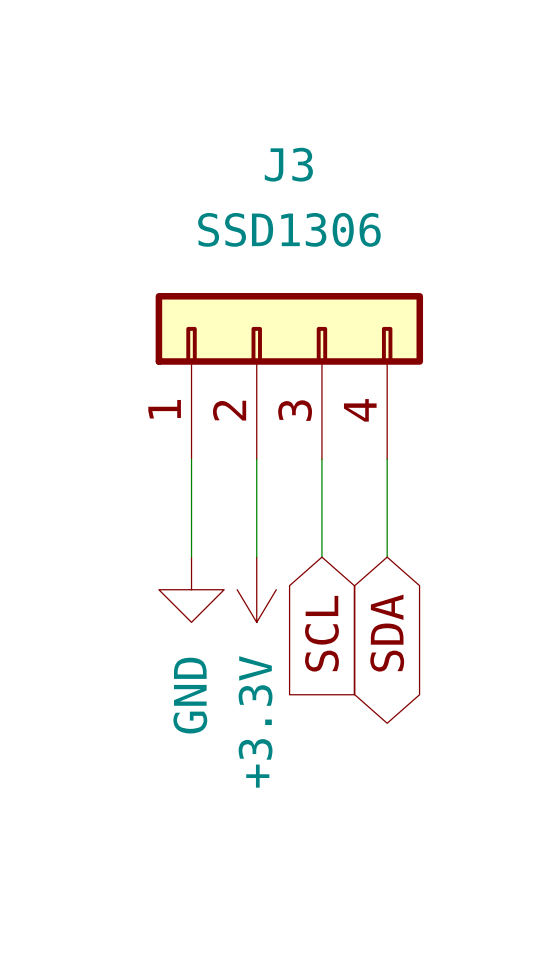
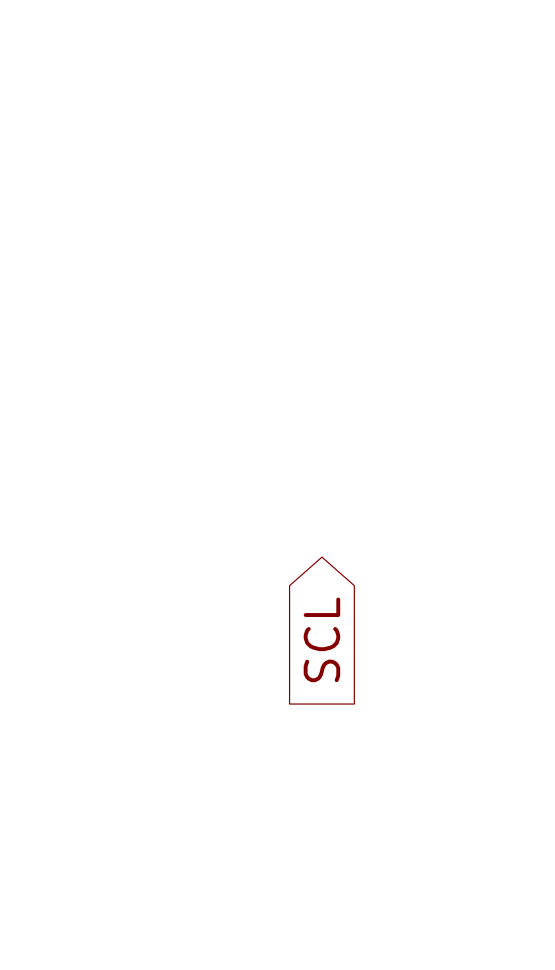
J3: SSD1306 (289, 376) -> none
wire: (191, 459) (191, 557) -> none
wire: (256, 459) (256, 557) -> none
wire: (321, 459) (321, 557) -> none
wire: (387, 459) (387, 557) -> none
power symbol: GND (191, 589) -> none
power symbol: +3.3V (256, 589) -> none
global label: SDA (387, 633) -> none

